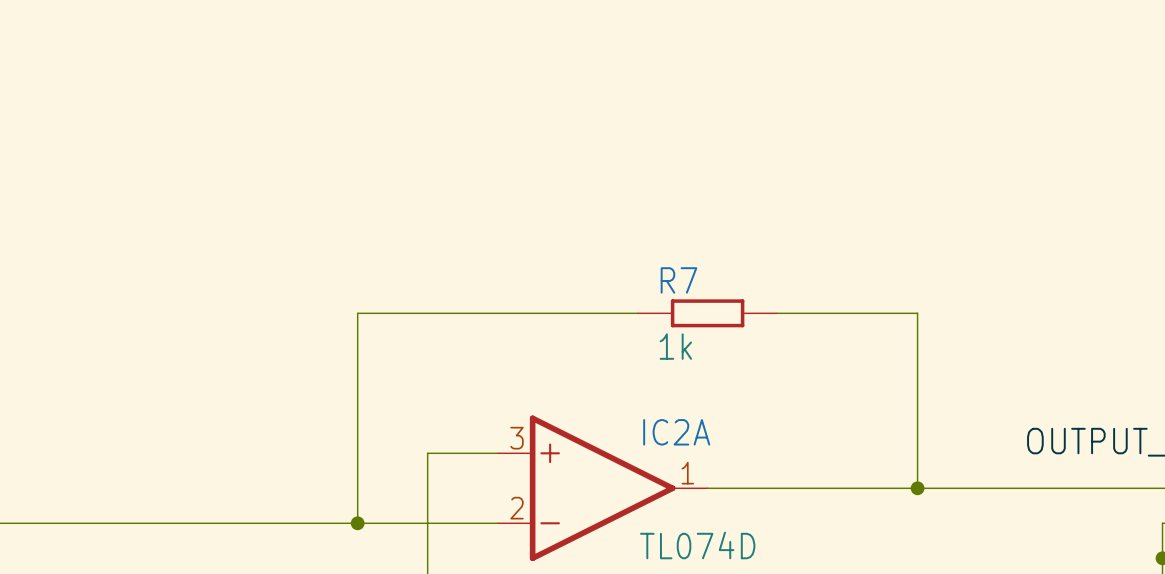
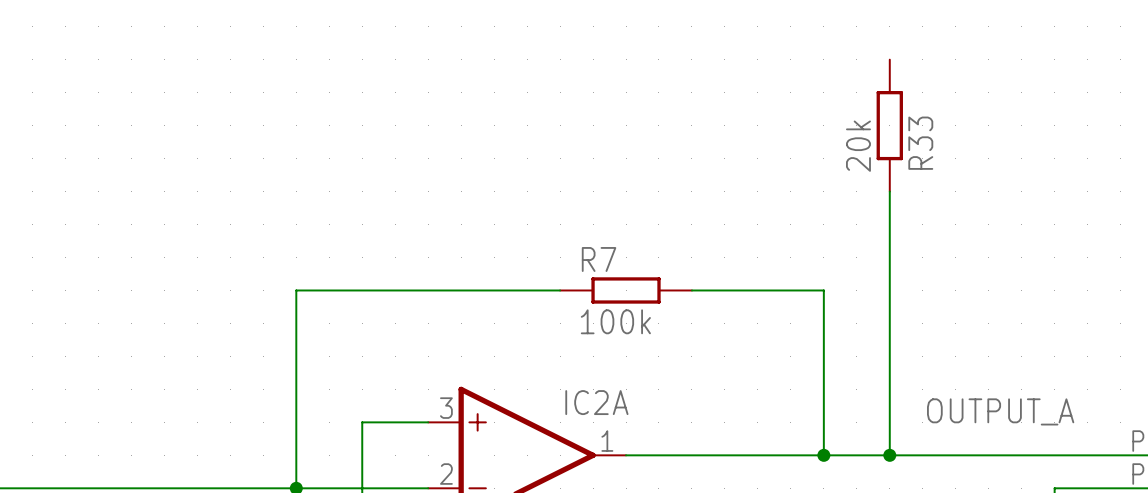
R33: none -> 20k (889, 125)
wire: none -> (889, 191) (889, 455)
R7 value: 1k (675, 346) -> 100k (615, 321)
junction: none -> (889, 455)

